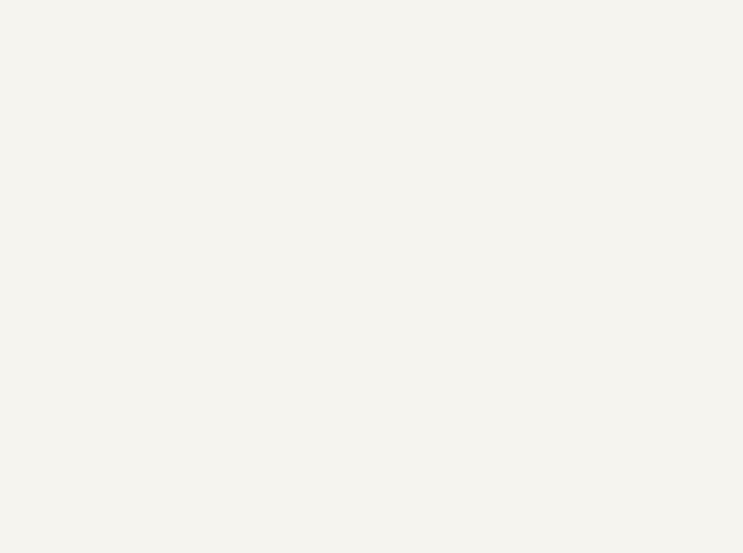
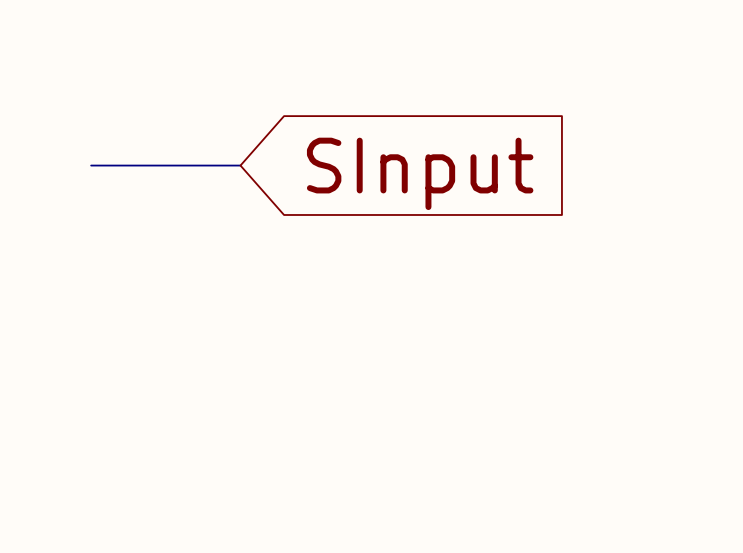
wire: none -> (91, 165) (240, 165)
global label: none -> SInput (420, 173)

